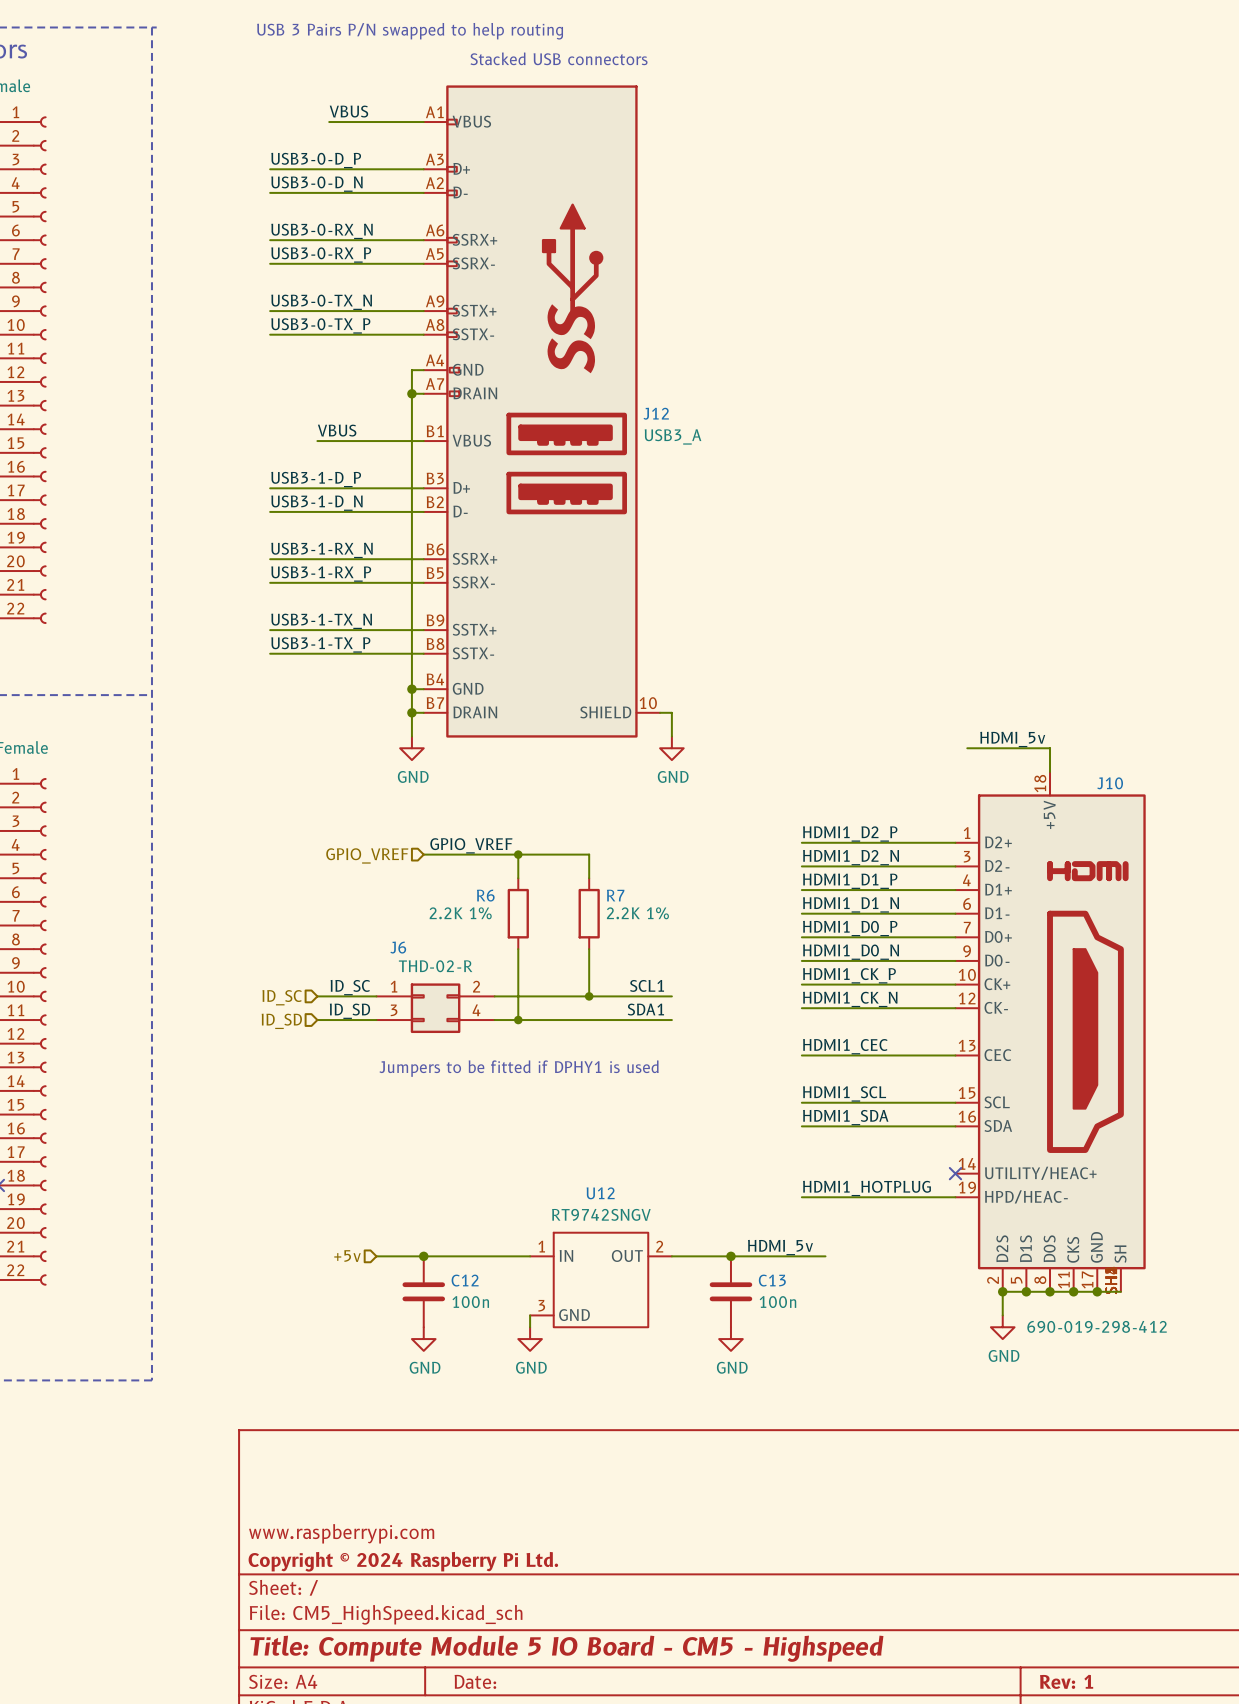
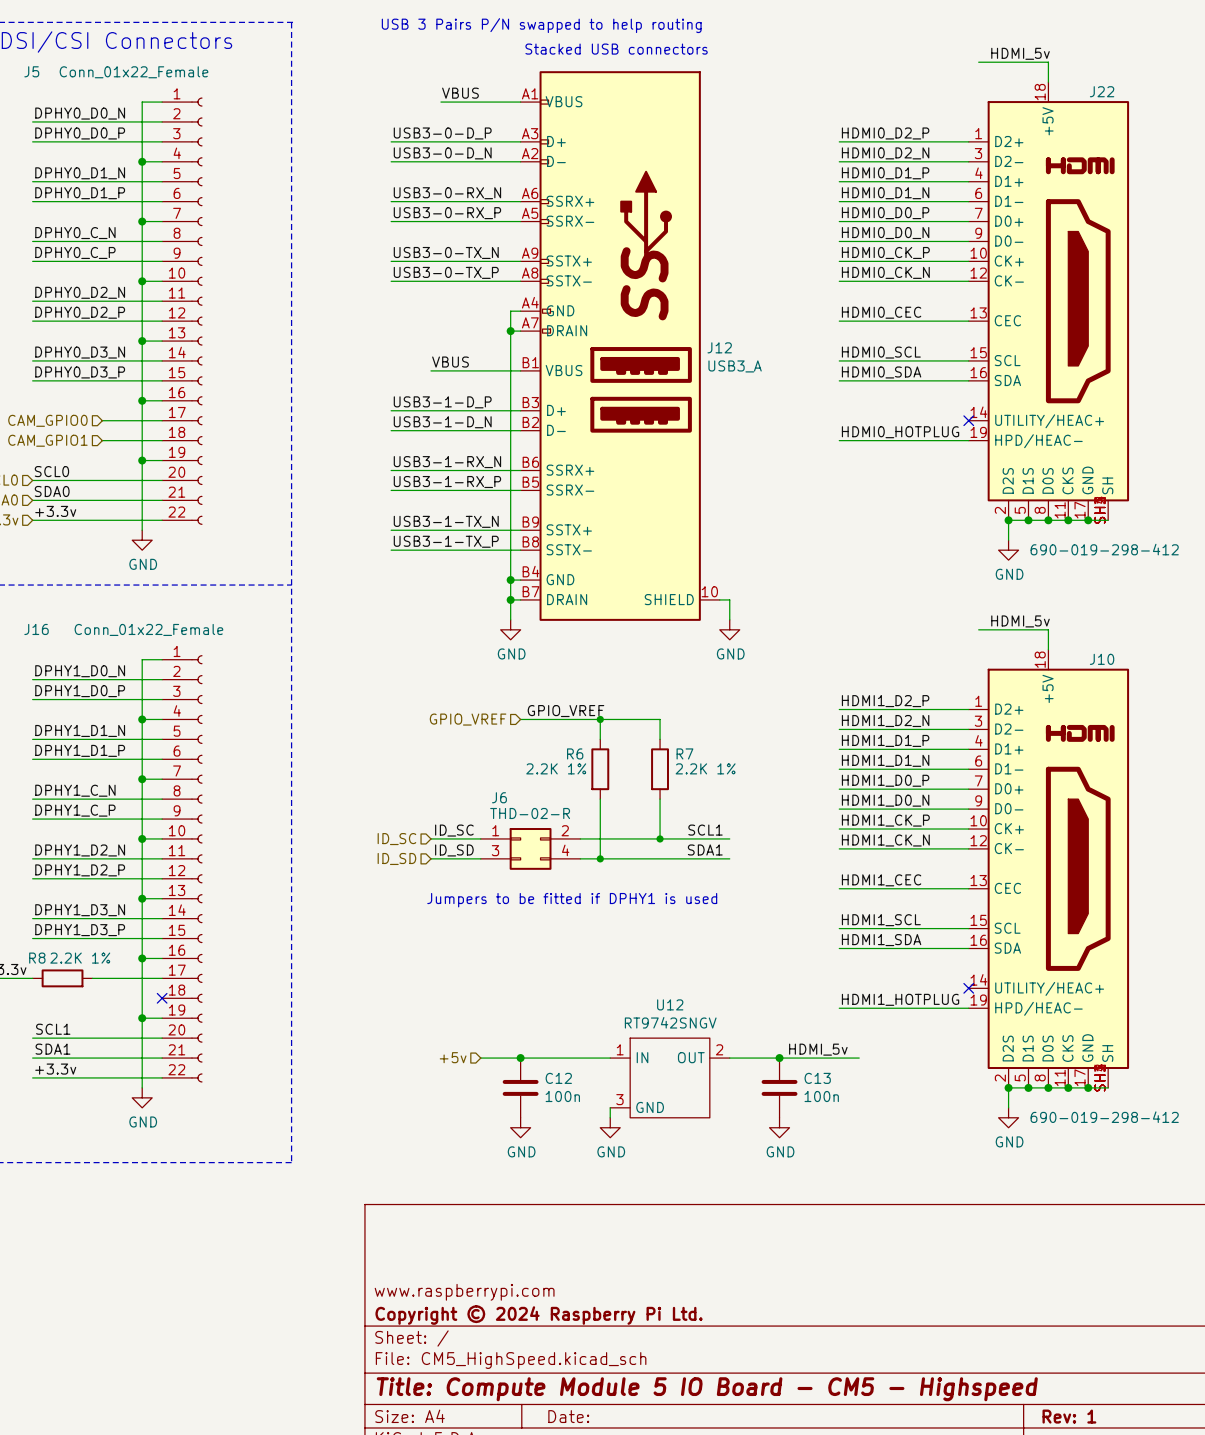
label: none -> HDMI_5v (1020, 53)
wire: none -> (978, 62) (1048, 62) (1048, 82)
label: none -> HDMI0_D2_P (885, 133)
wire: none -> (839, 141) (968, 141)
label: none -> HDMI0_D2_N (885, 153)
wire: none -> (839, 161) (968, 161)
label: none -> HDMI0_D1_P (885, 173)
wire: none -> (839, 181) (968, 181)
label: none -> HDMI0_D1_N (885, 193)
wire: none -> (839, 201) (968, 201)
label: none -> HDMI0_D0_P (885, 213)
wire: none -> (839, 221) (968, 221)
label: none -> HDMI0_D0_N (885, 233)
wire: none -> (839, 241) (968, 241)
label: none -> HDMI0_CK_P (885, 252)
wire: none -> (839, 261) (968, 261)
label: none -> HDMI0_CK_N (885, 272)
wire: none -> (839, 281) (968, 281)
J22: none -> 690-019-298-412 (1048, 301)
label: none -> HDMI0_CEC (881, 312)
wire: none -> (839, 321) (968, 321)
label: none -> HDMI0_SCL (881, 352)
wire: none -> (839, 360) (968, 360)
label: none -> HDMI0_SDA (881, 372)
wire: none -> (839, 380) (968, 380)
no-connect mark: none -> (968, 420)
label: none -> HDMI0_HOTPLUG (900, 432)
wire: none -> (839, 440) (968, 440)
junction: none -> (1008, 520)
junction: none -> (1028, 520)
junction: none -> (1048, 520)
junction: none -> (1068, 520)
junction: none -> (1088, 520)
wire: none -> (1108, 520) (1008, 520) (1008, 540)
power symbol: none -> GND (1008, 550)

